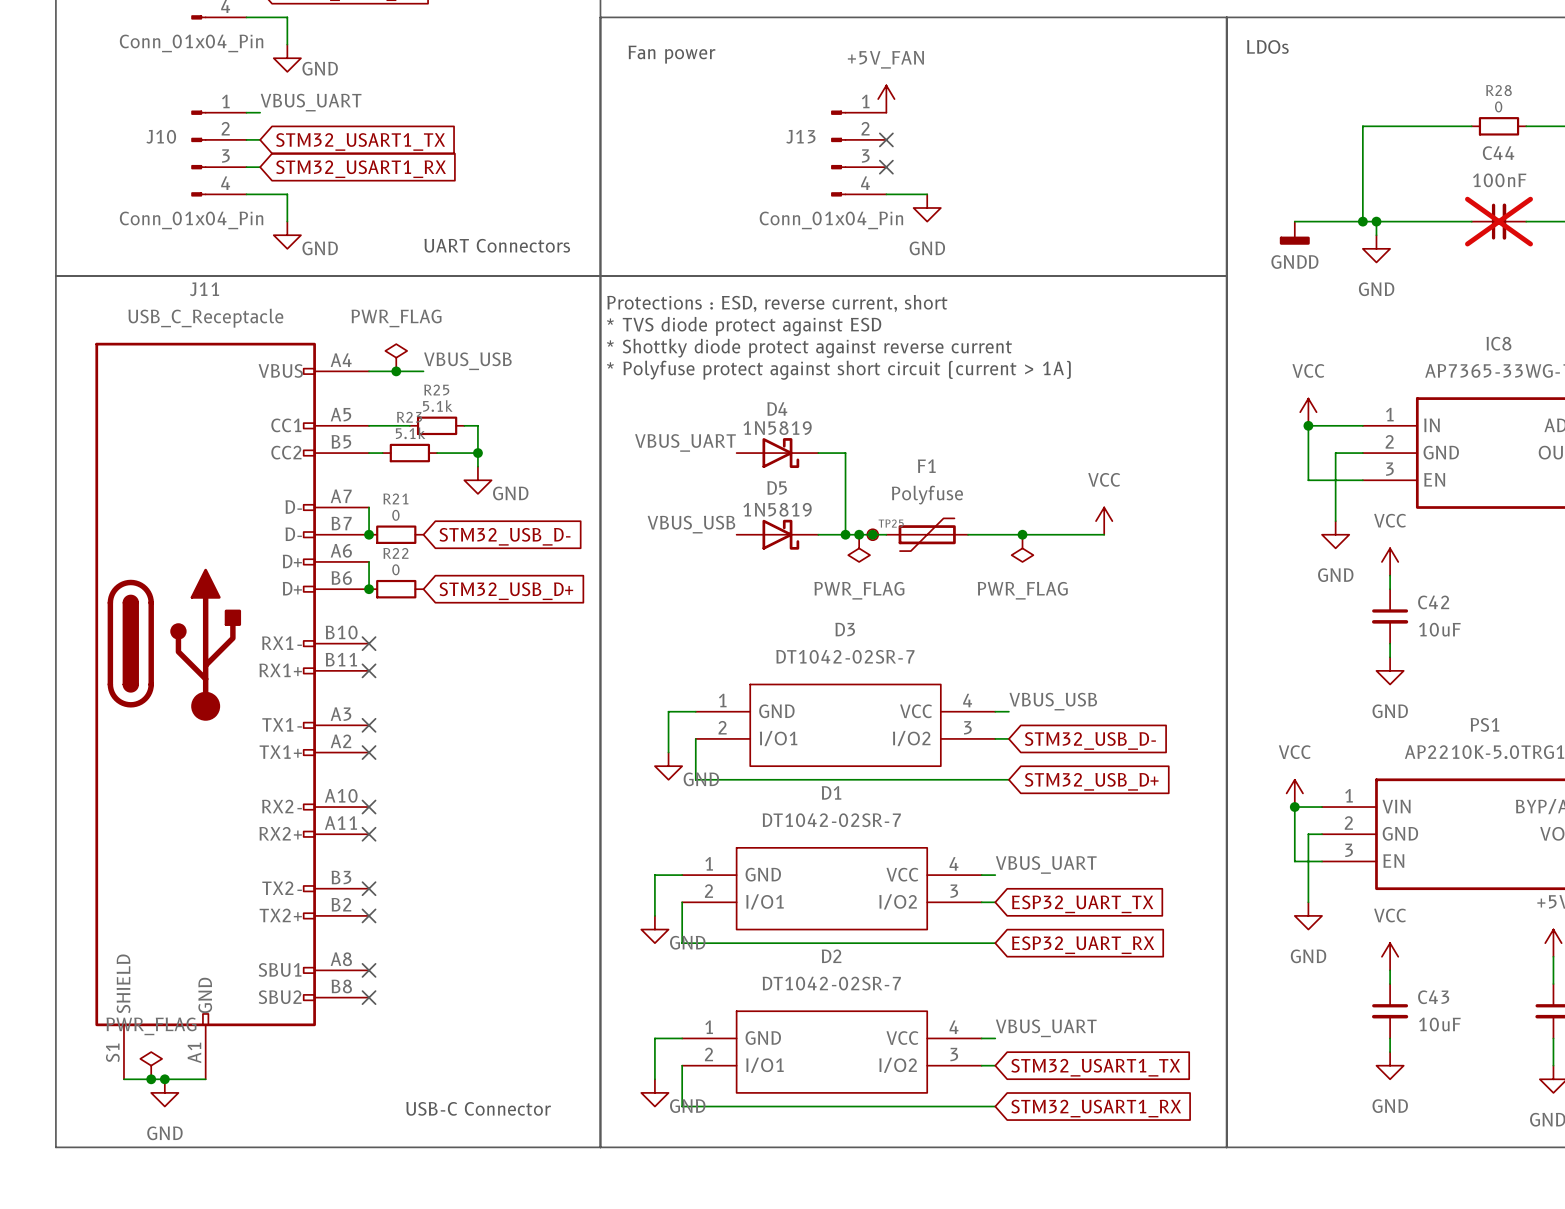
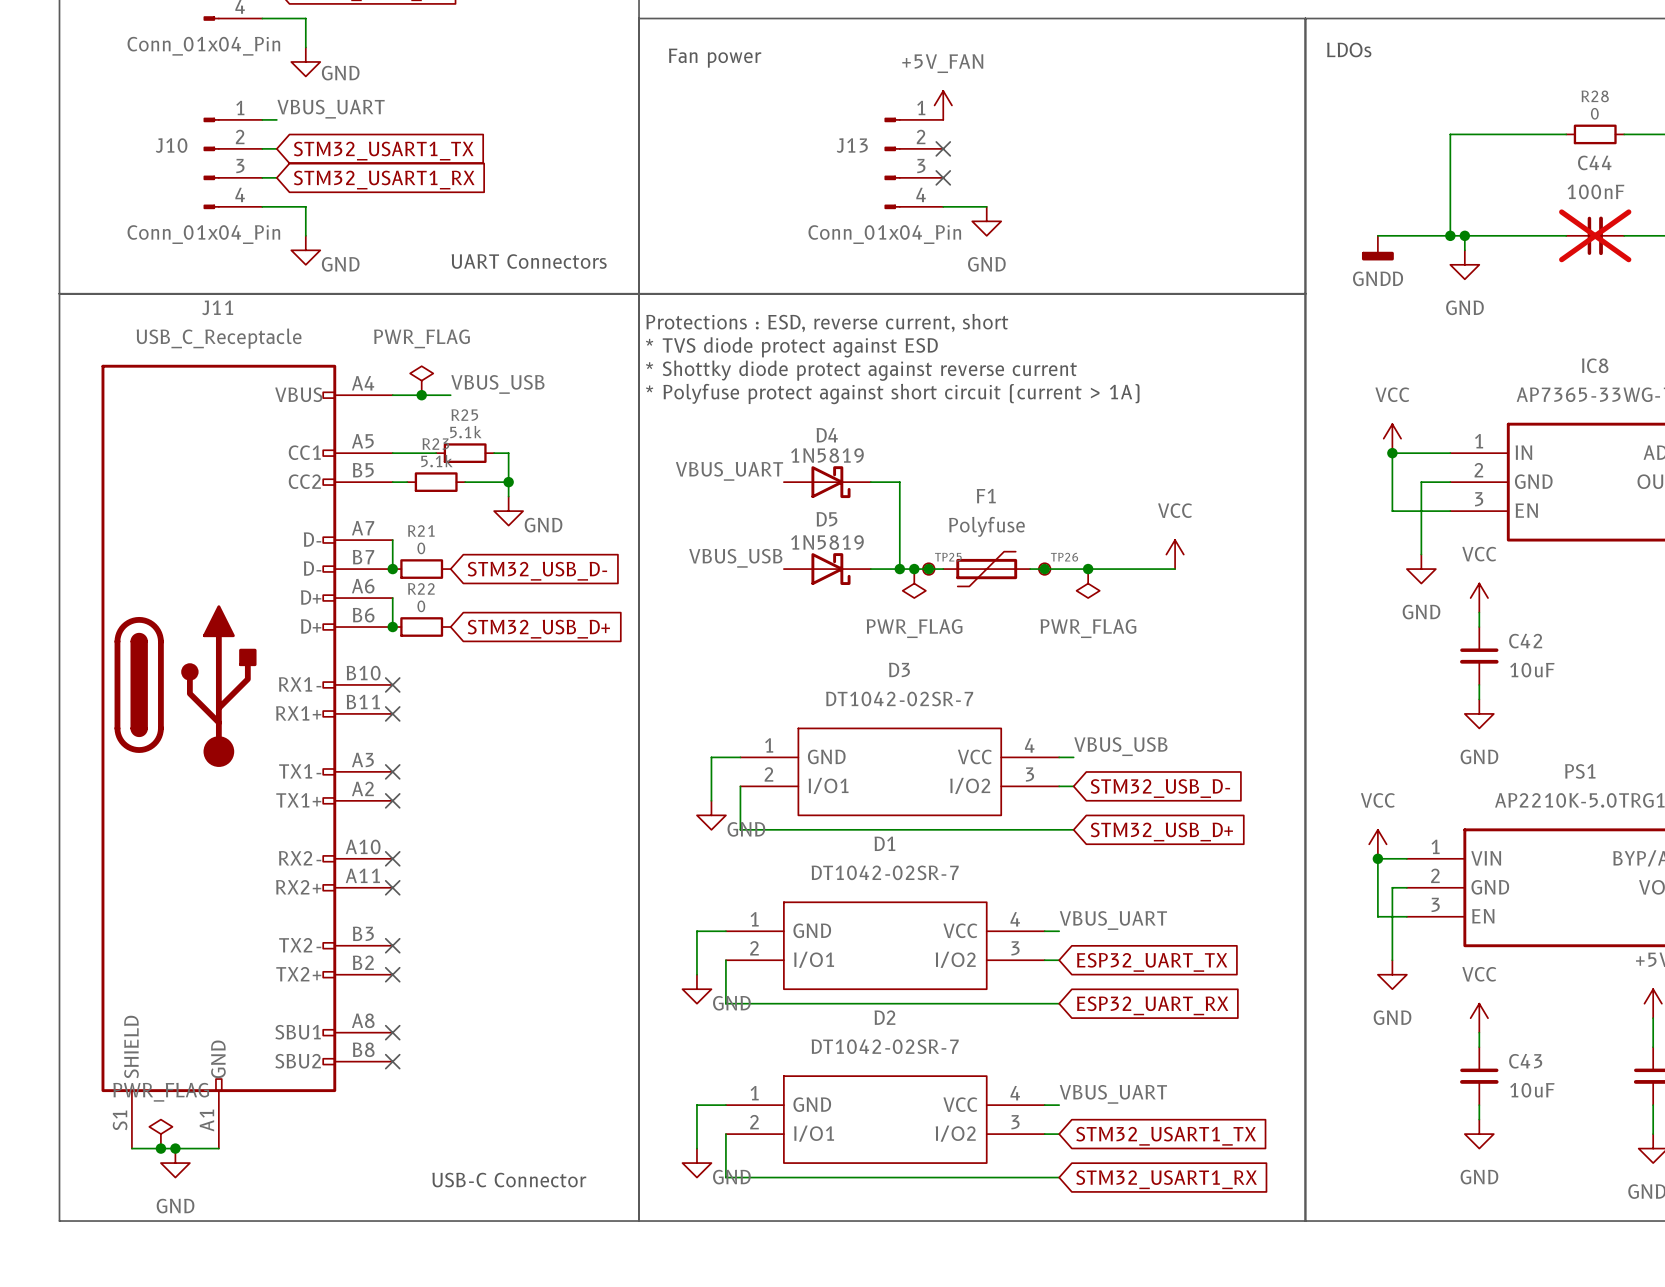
junction: none -> (1044, 569)
TP26: none -> (1044, 569)

